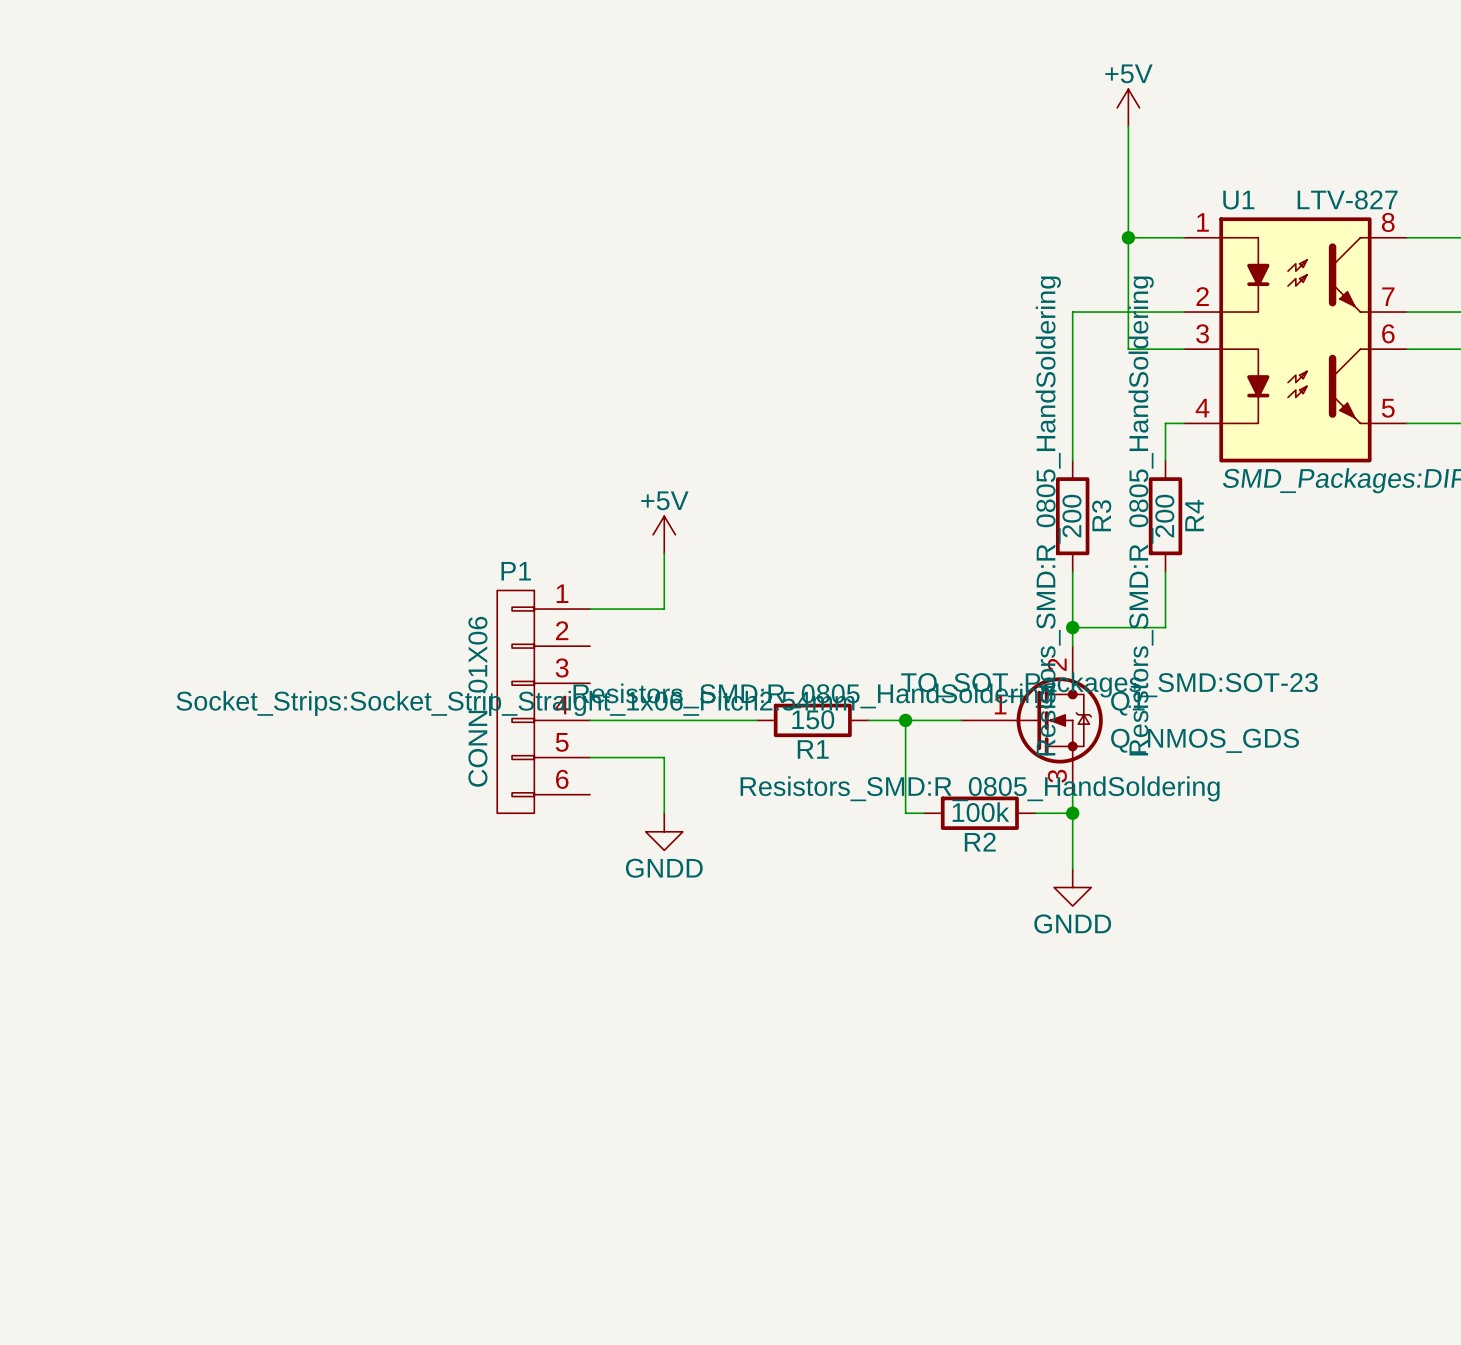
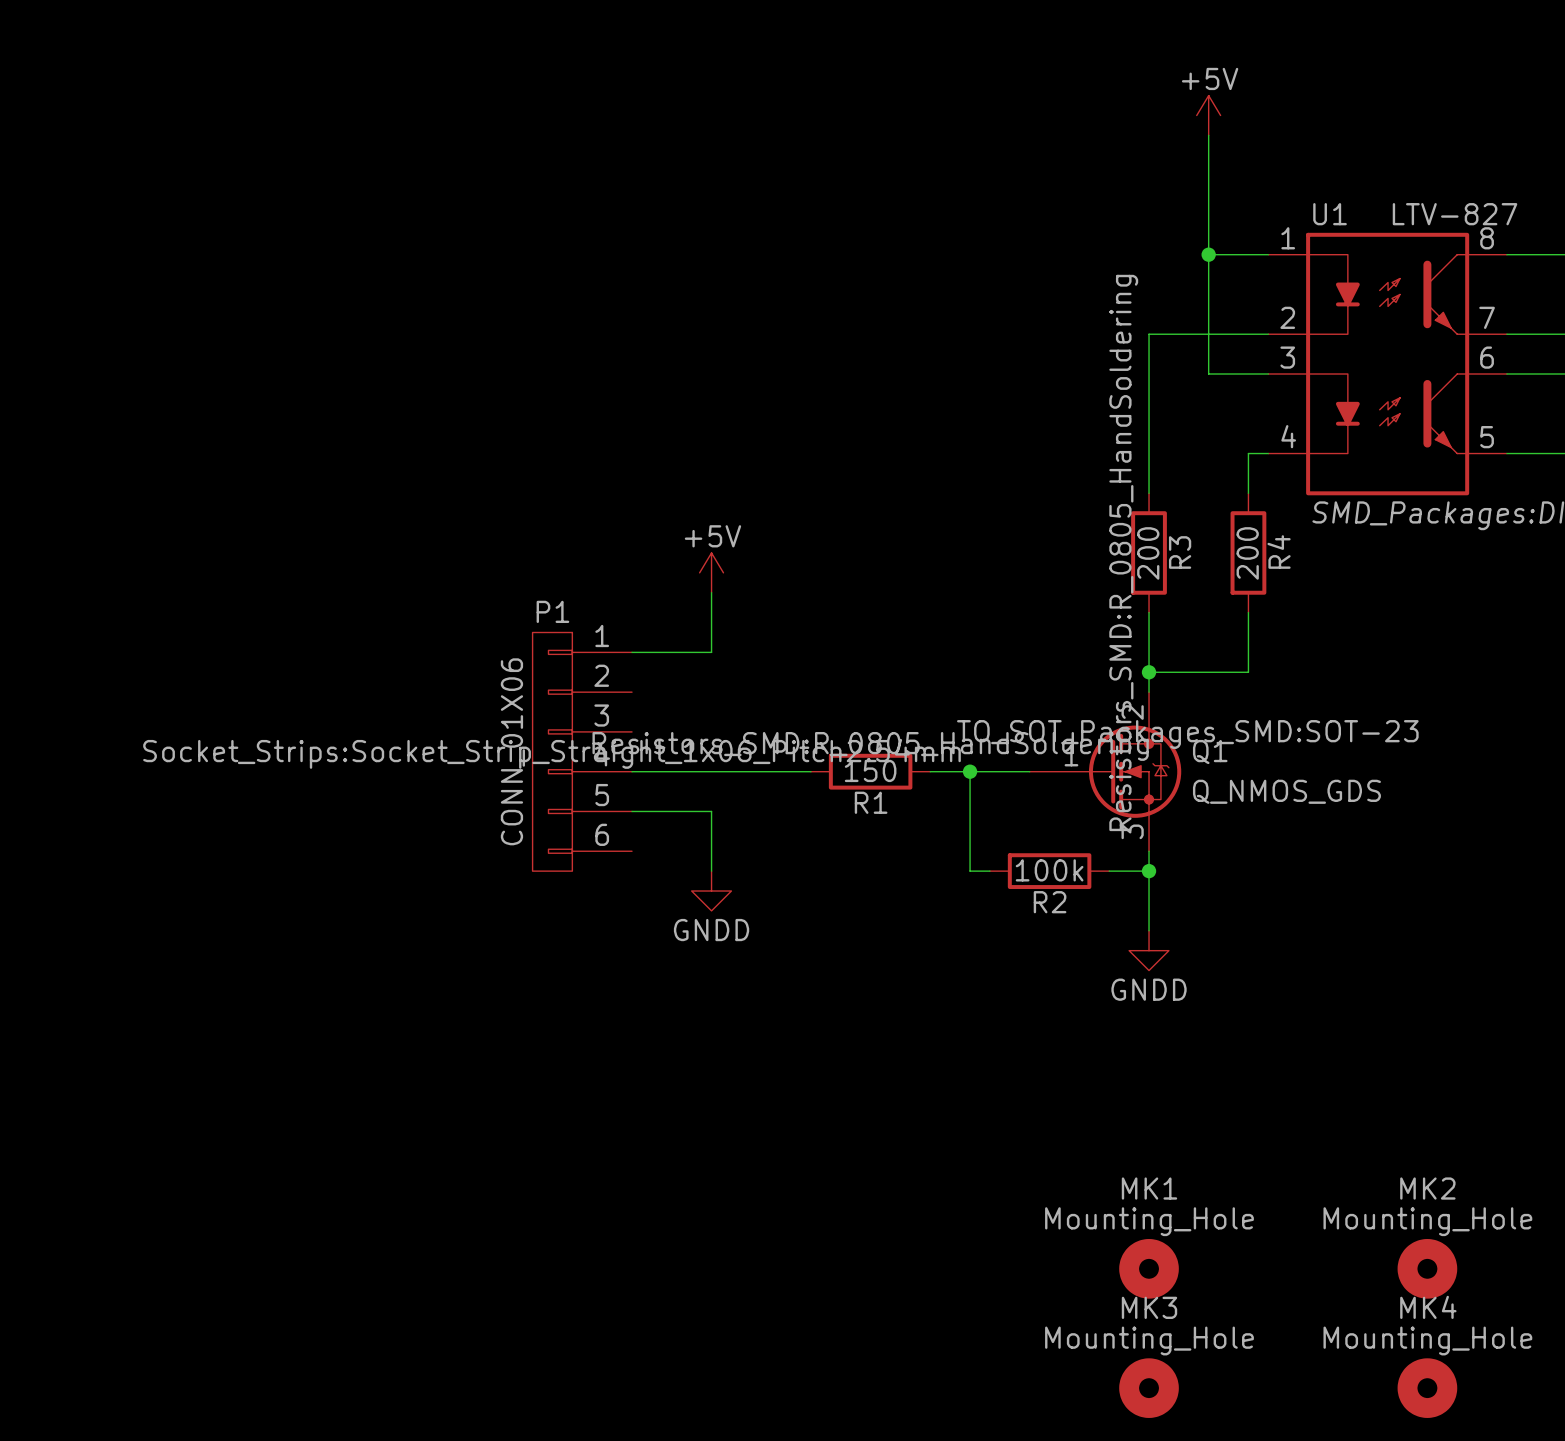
R4 text: Resistors_SMD:R_0805_HandSoldering (1141, 515) -> none
R2 text: Resistors_SMD:R_0805_HandSoldering (980, 788) -> none
MK1: none -> Mounting_Hole (1149, 1268)
MK2: none -> Mounting_Hole (1427, 1268)
MK3: none -> Mounting_Hole (1149, 1388)
MK4: none -> Mounting_Hole (1427, 1388)

